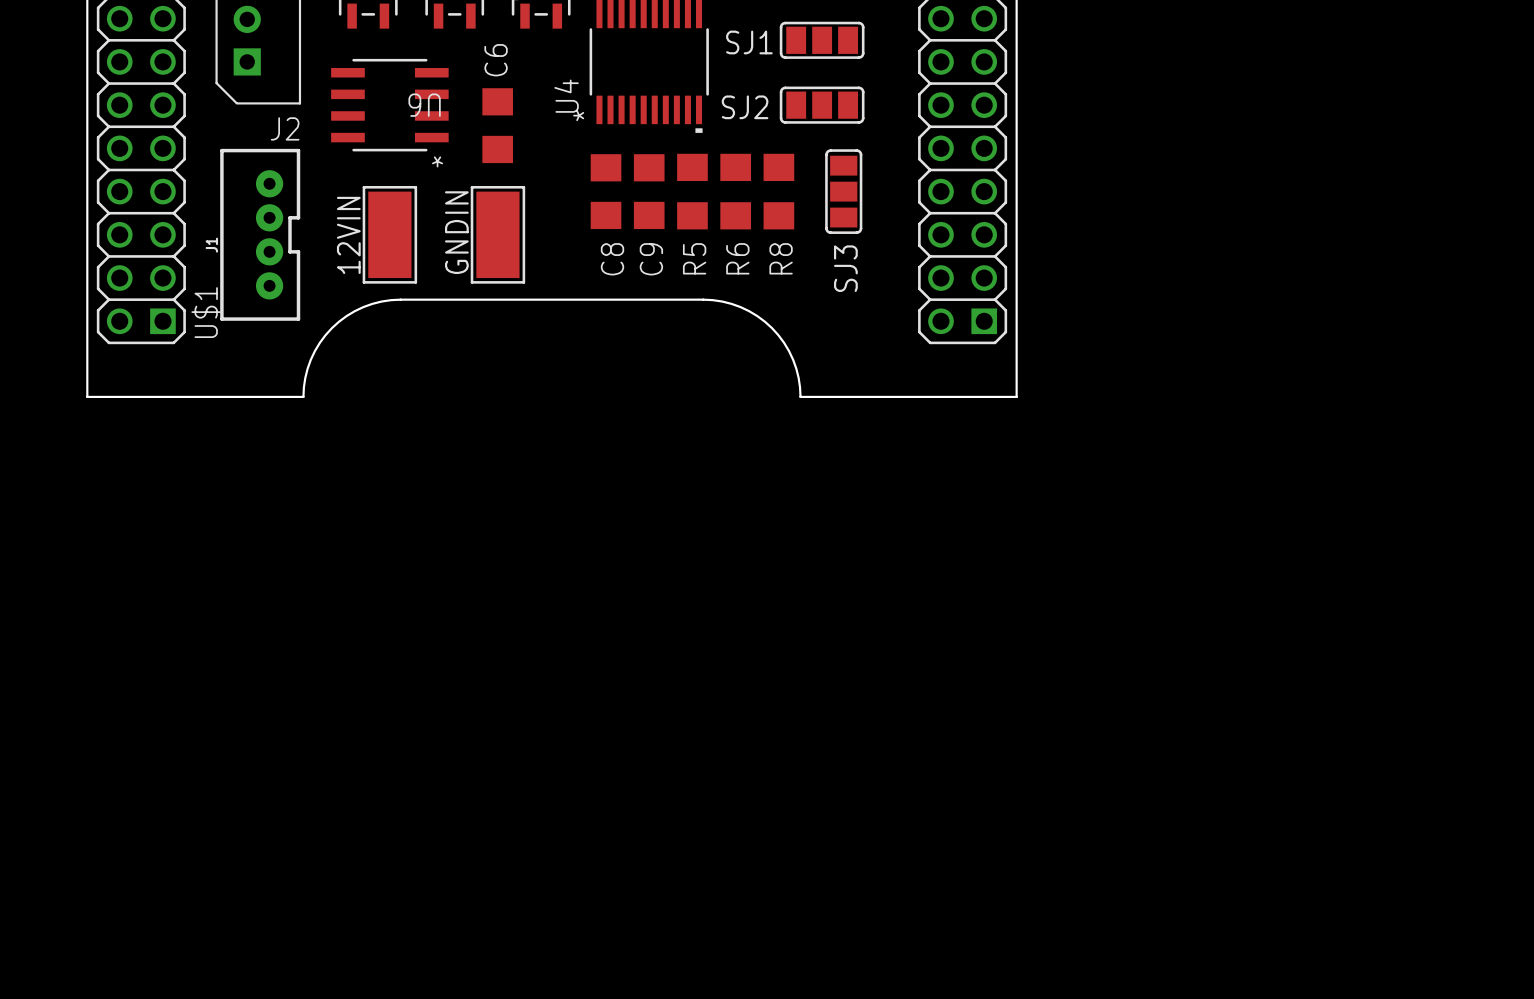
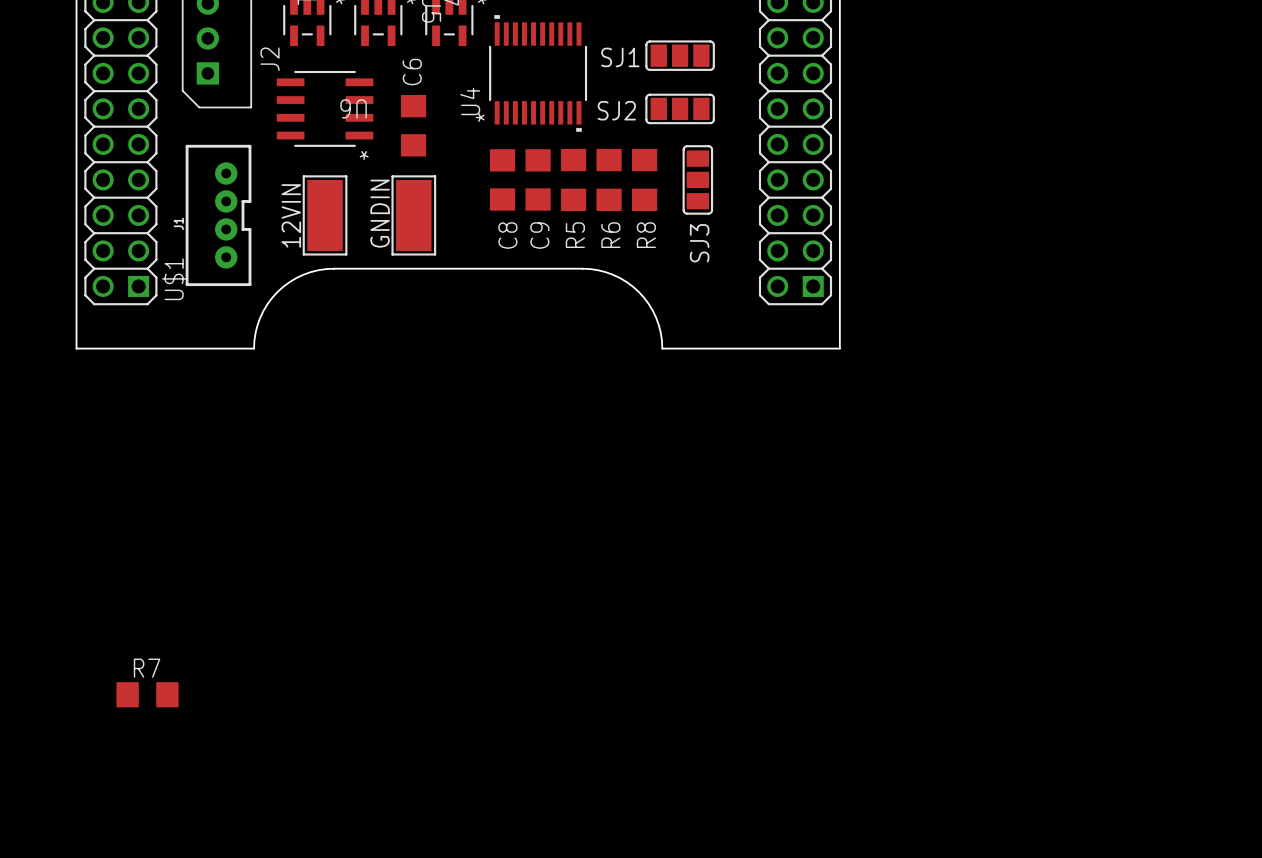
J2 name rotation: 0° (285, 128) -> 90° counterclockwise (270, 59)
J2 name position: J2 (285, 128) -> J2 (270, 59)
R7: none -> (147, 694)

